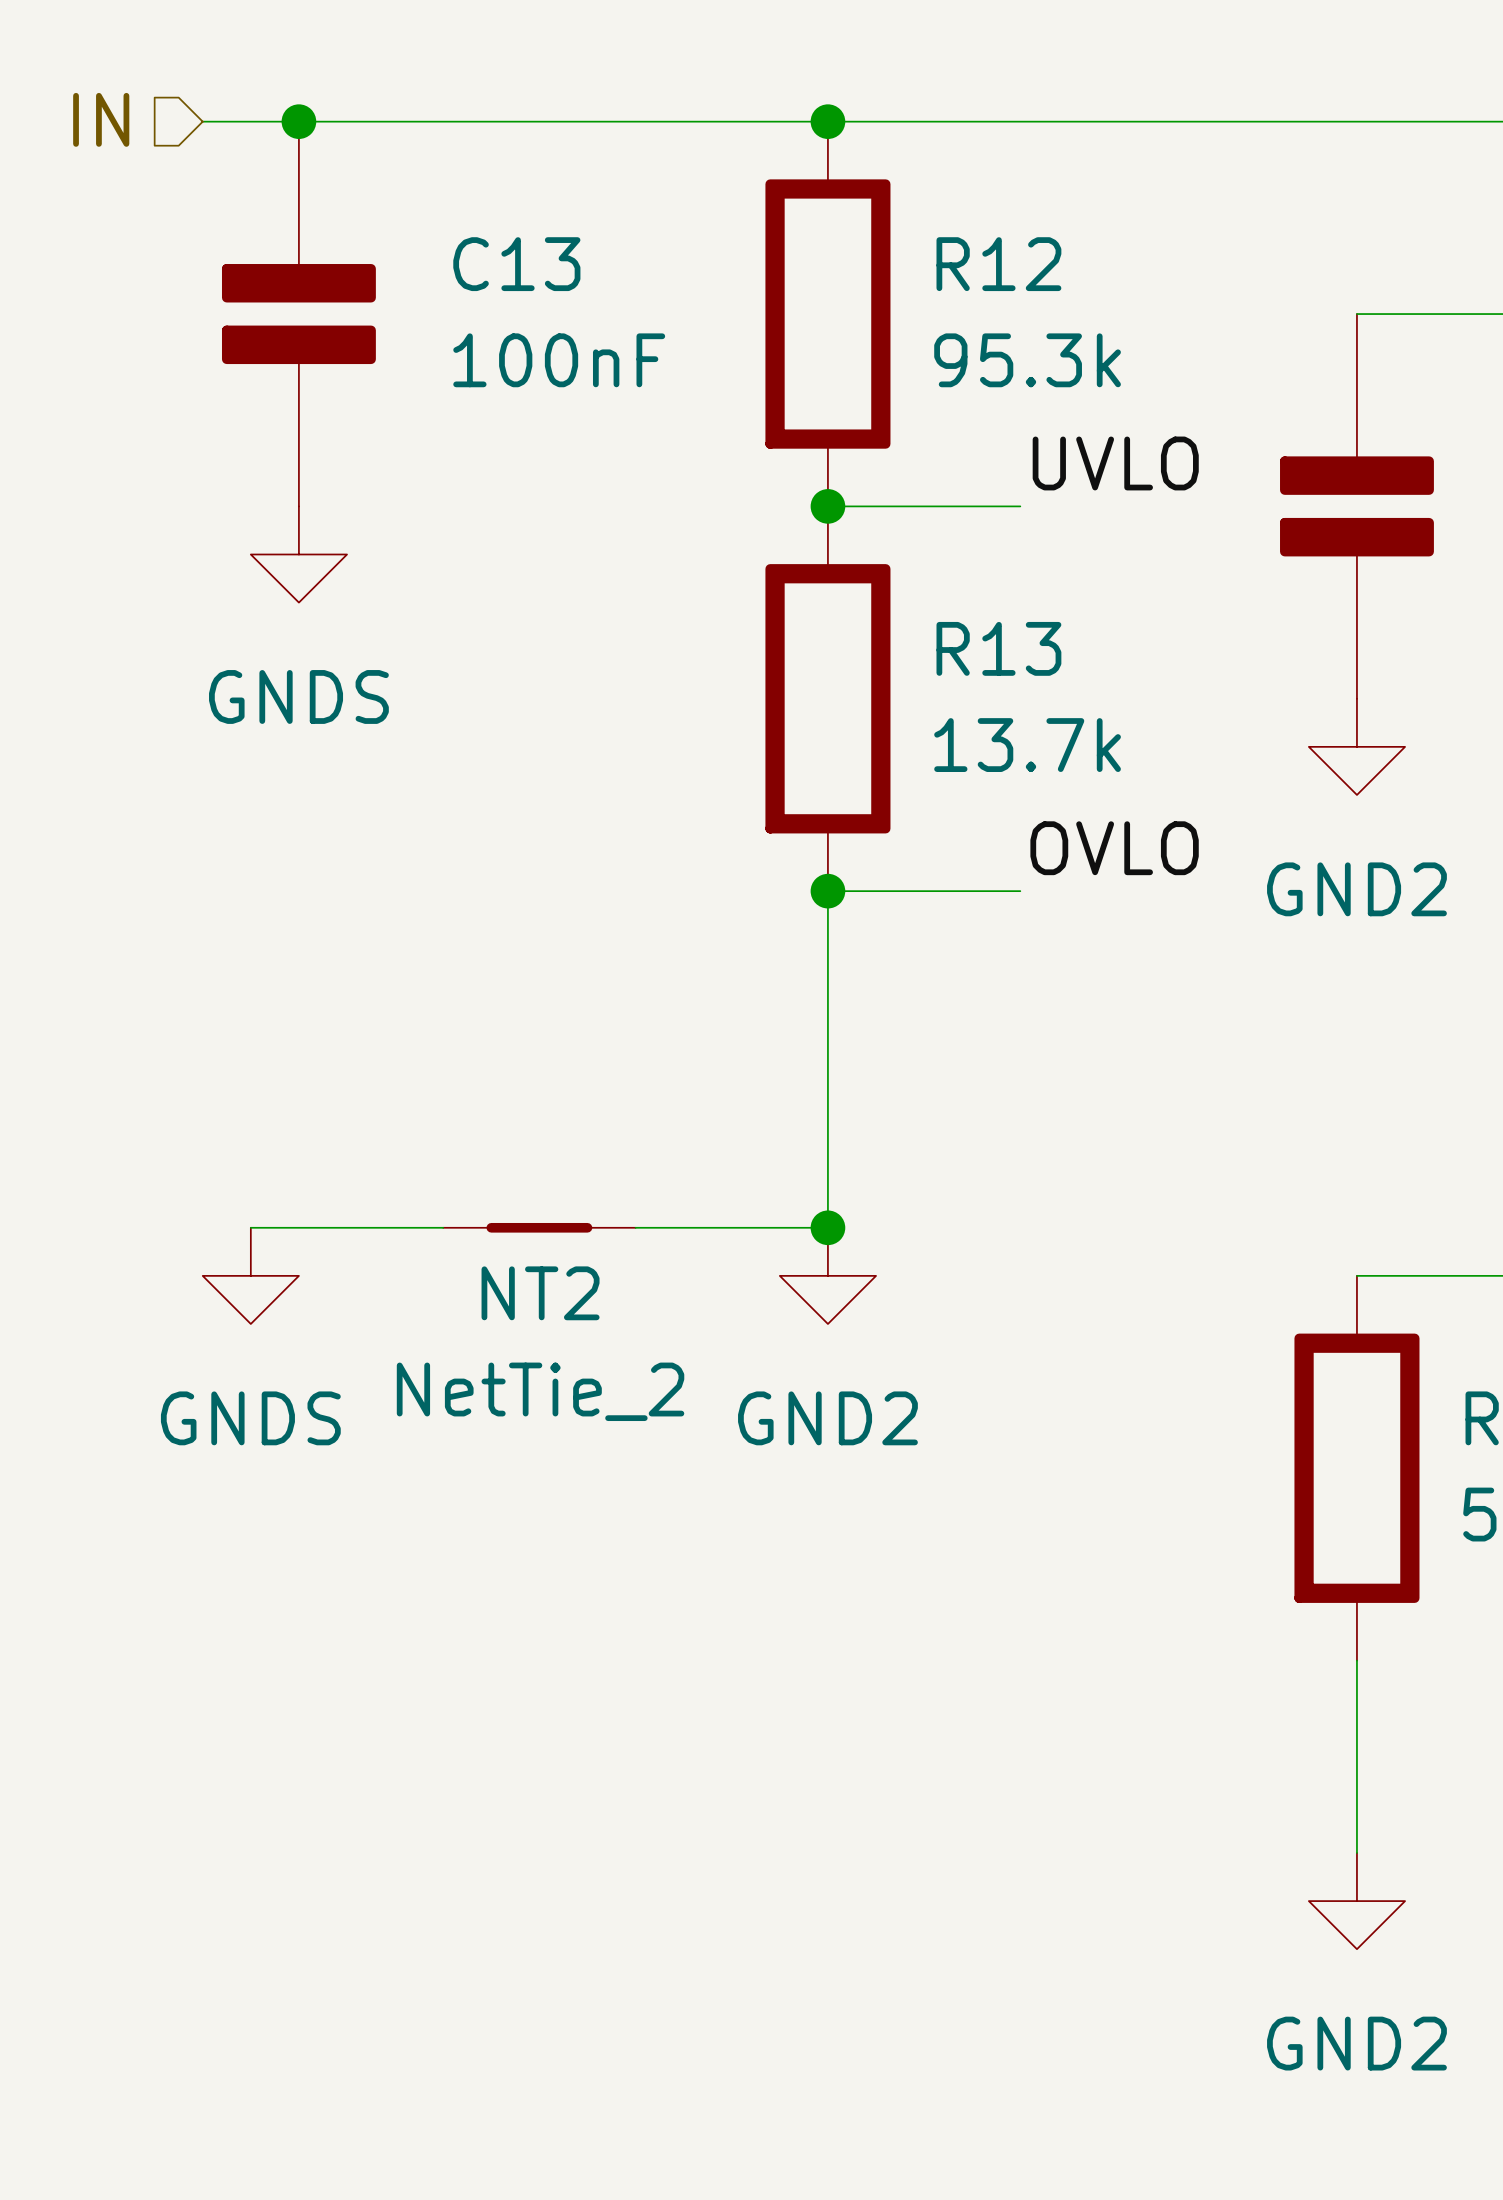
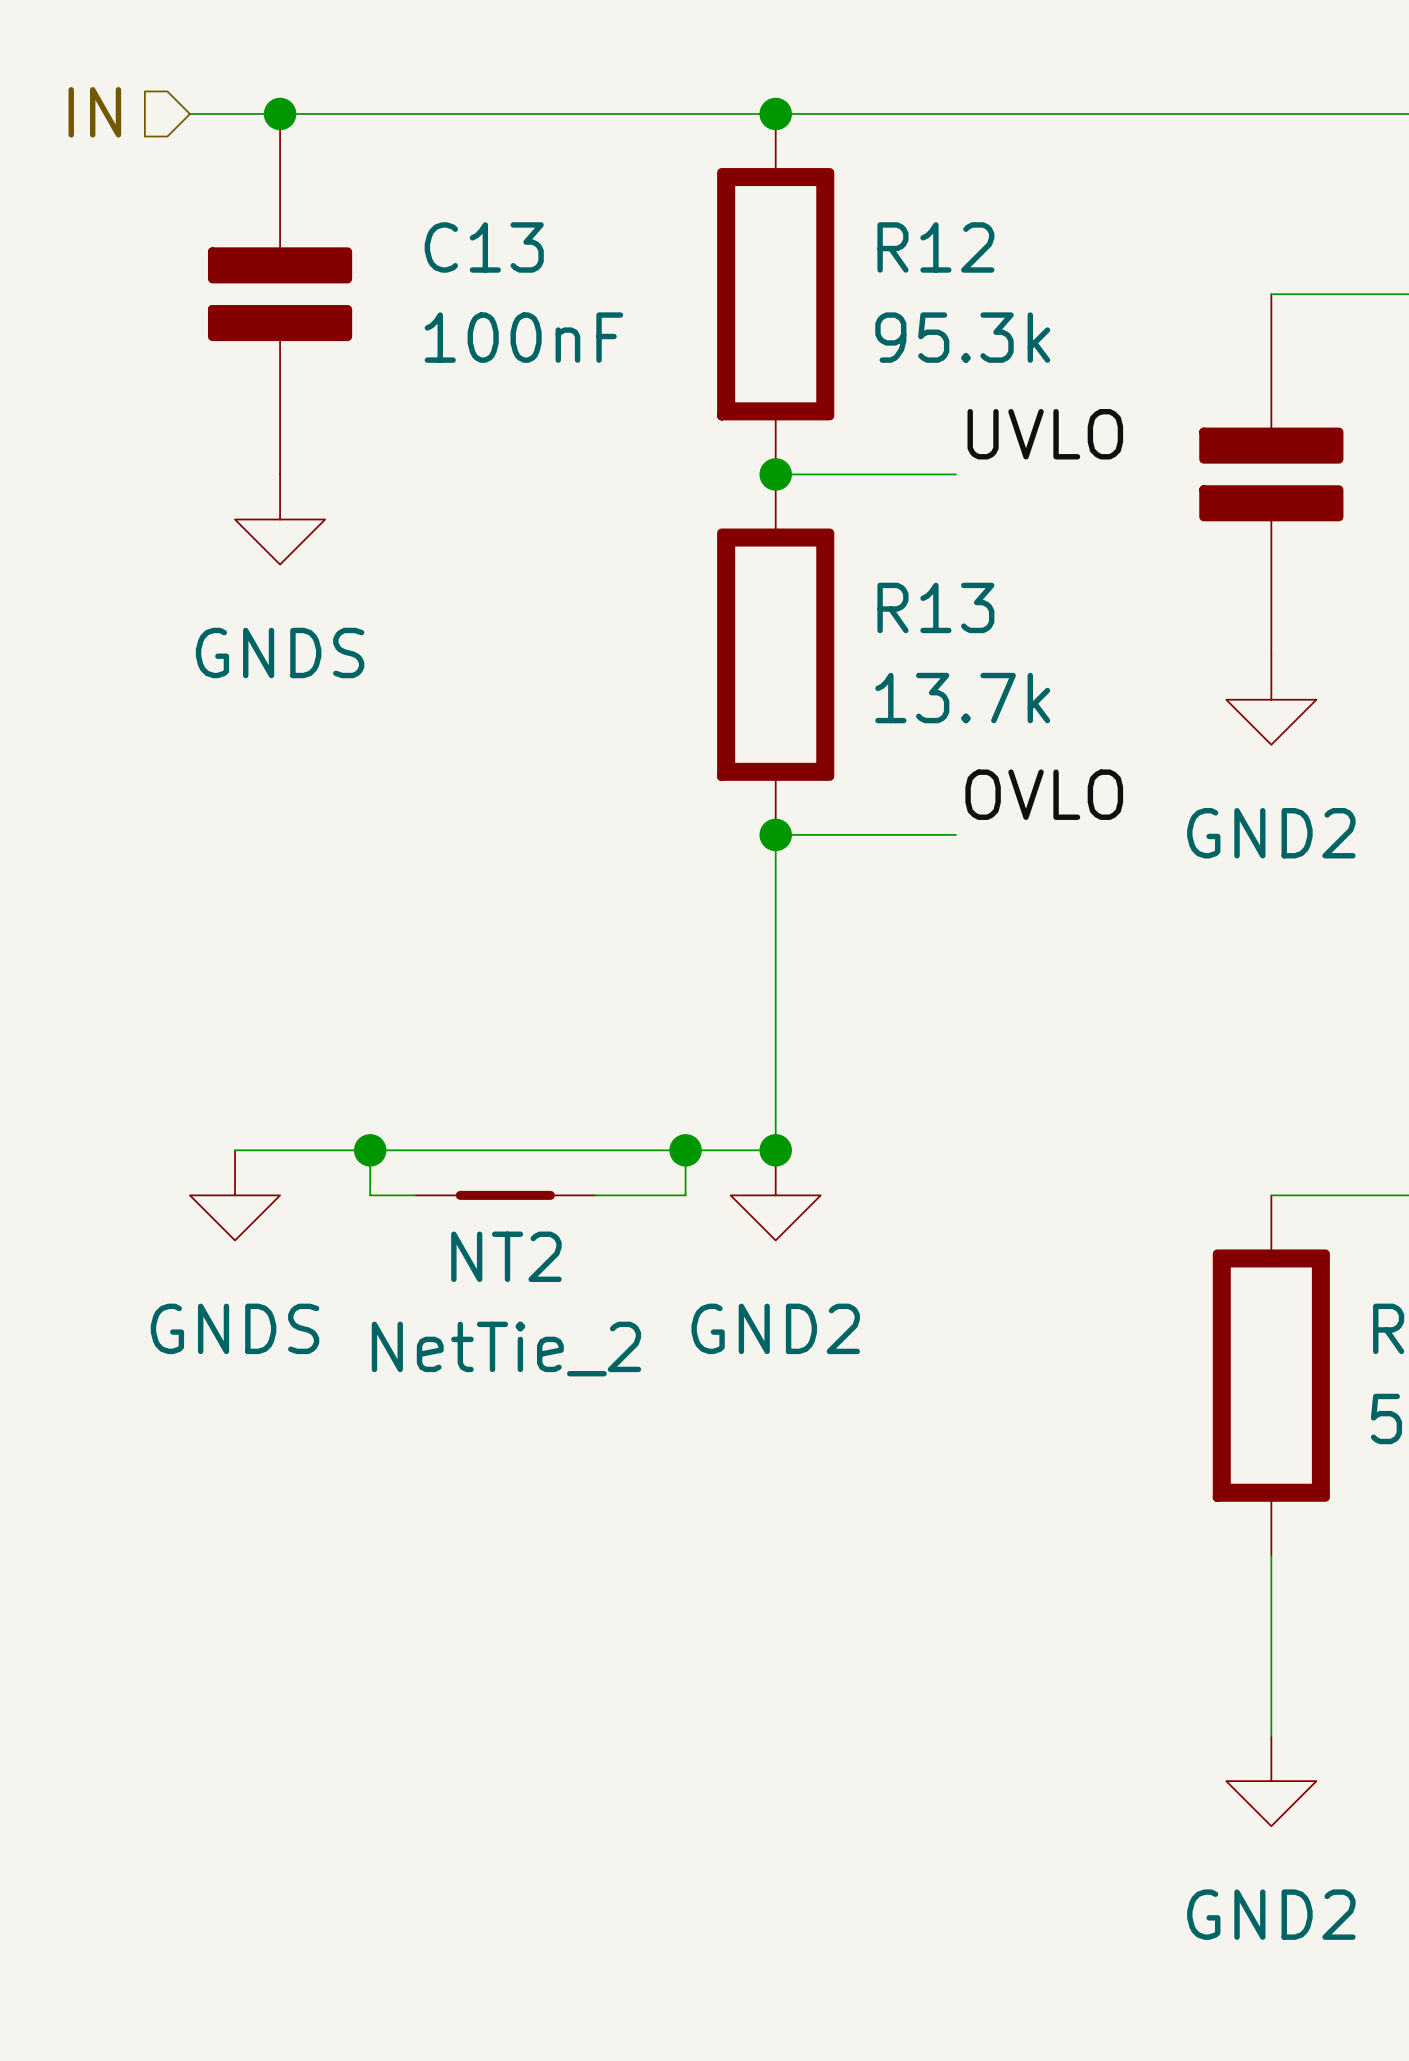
wire: none -> (370, 1150) (370, 1195) (415, 1195)
junction: none -> (370, 1150)
NT2 position: (539, 1227) -> (505, 1195)
wire: none -> (685, 1150) (685, 1195) (595, 1195)
junction: none -> (685, 1150)

